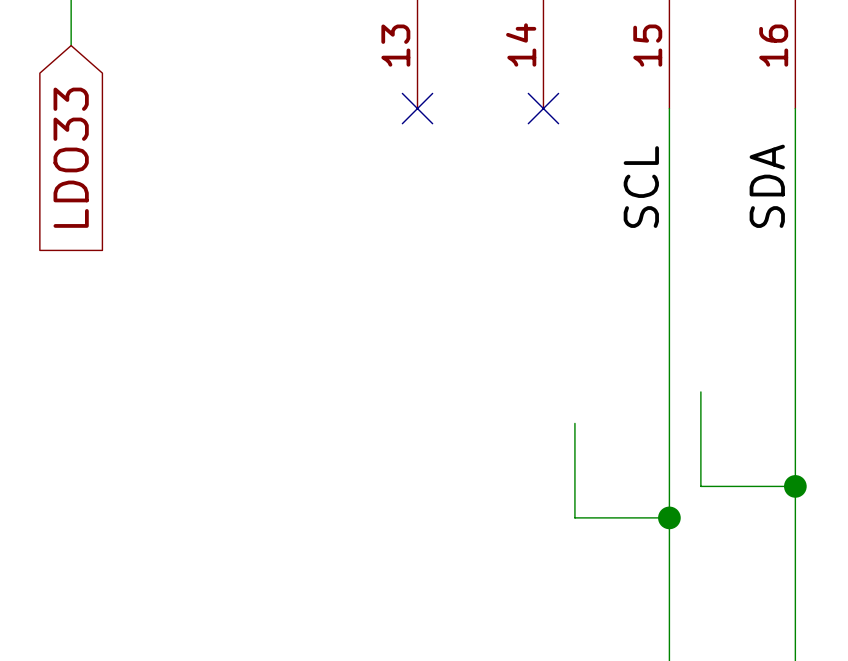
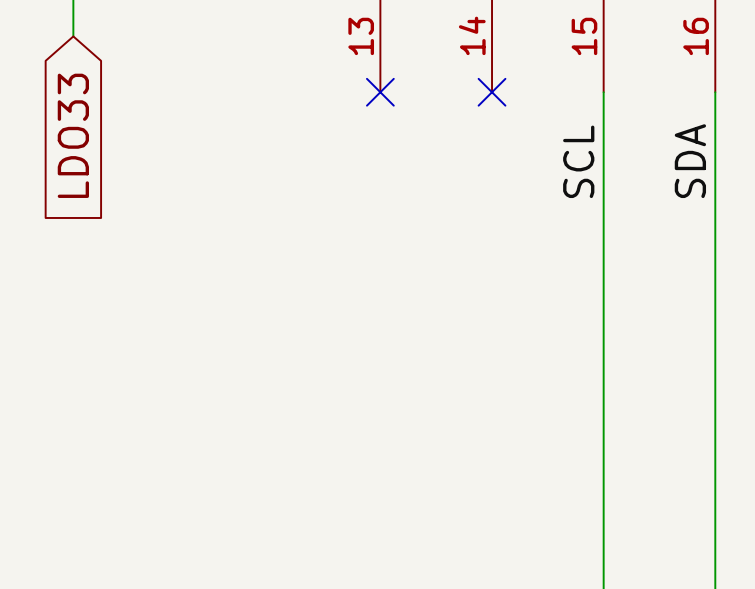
wire: (700, 391) (700, 486) (795, 486) -> none
wire: (574, 423) (574, 517) (669, 517) -> none
junction: (795, 486) -> none
junction: (669, 517) -> none

